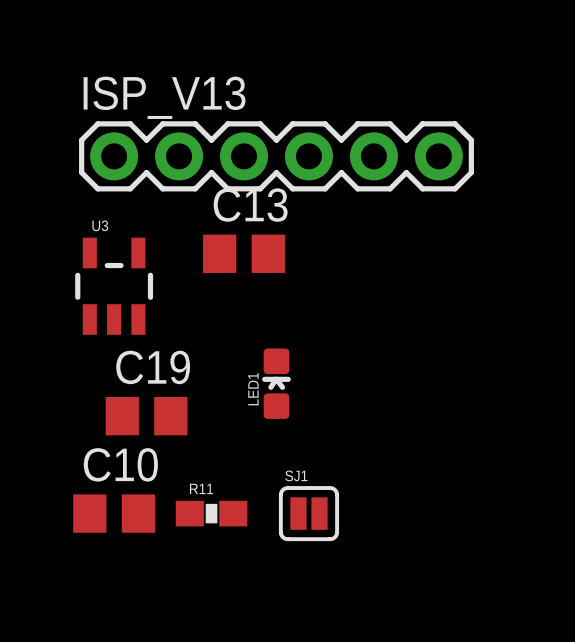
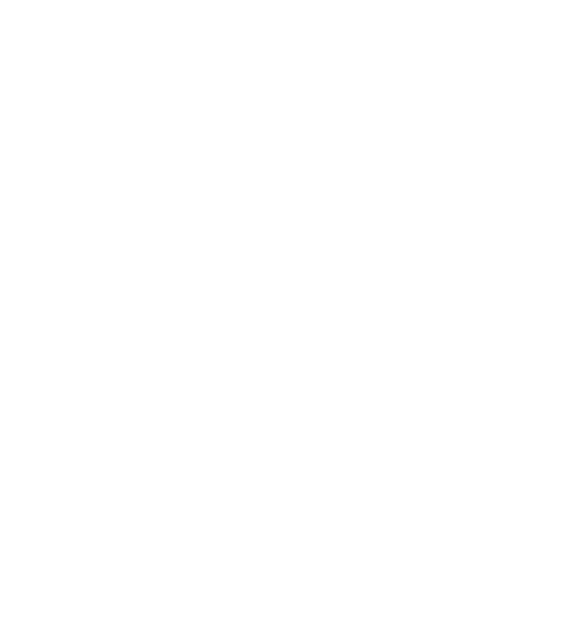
ISP_V13: (276, 156) -> none
C13: (244, 253) -> none
U3: (114, 286) -> none
LED1: (276, 383) -> none
C19: (146, 416) -> none
C10: (114, 513) -> none
R11: (211, 513) -> none
SJ1: (308, 513) -> none

